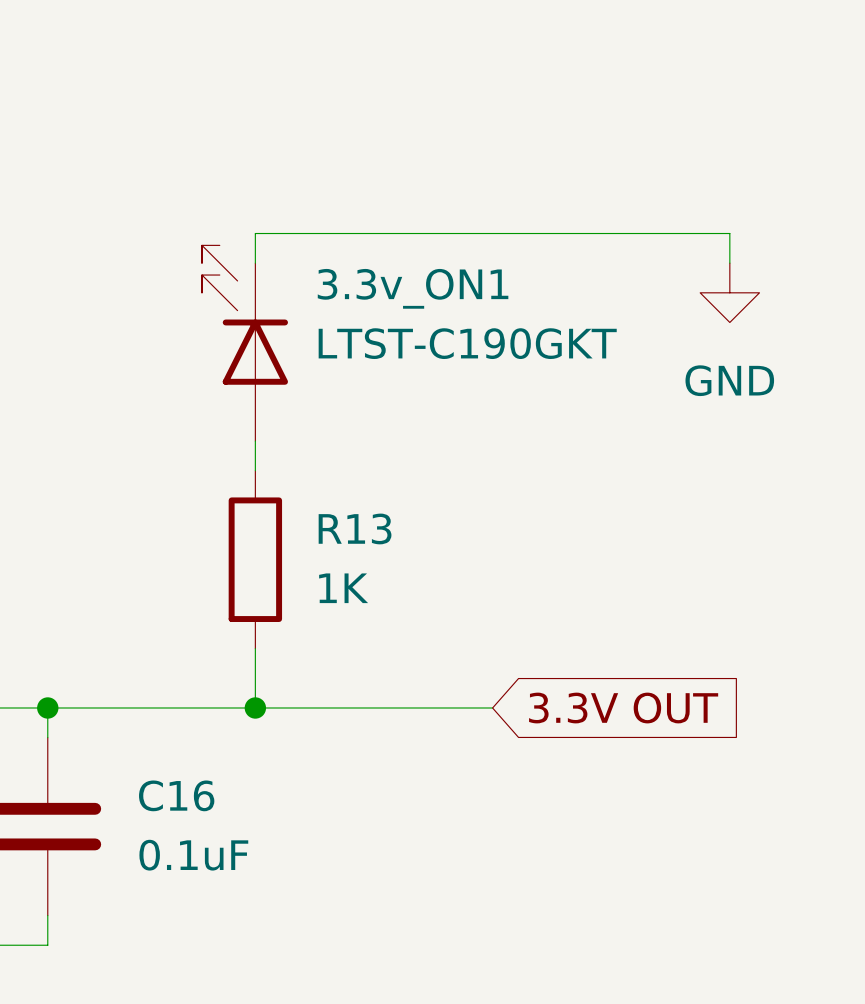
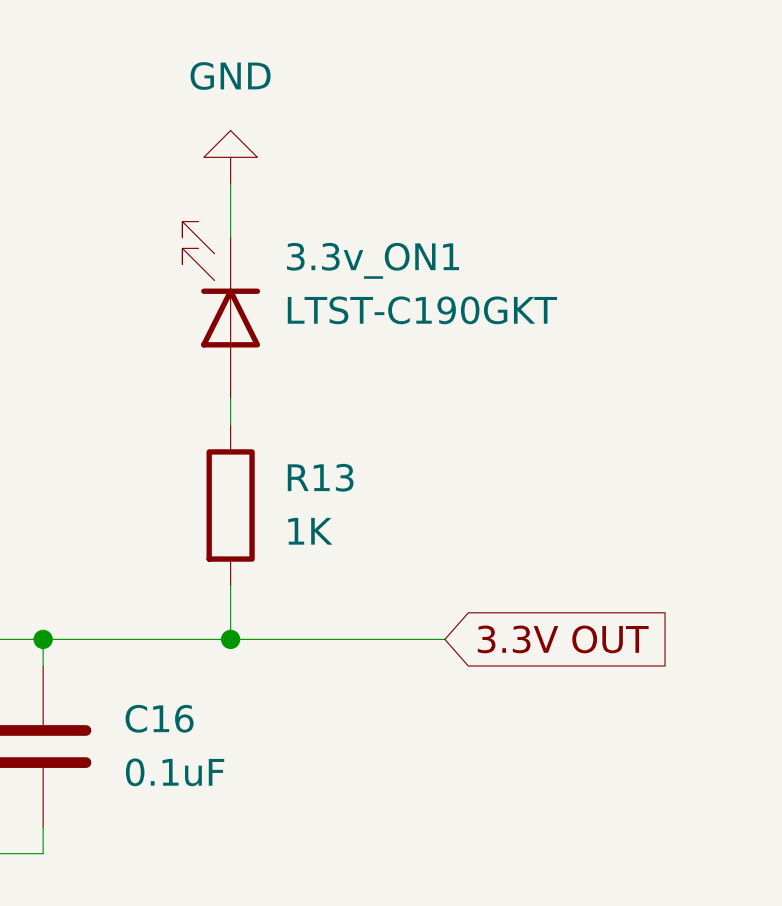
wire: (255, 233) (729, 233) (729, 263) -> (230, 210) (230, 184)
power symbol rotation: 0° (729, 292) -> 180° (230, 157)
power symbol position: GND (729, 292) -> GND (230, 157)

